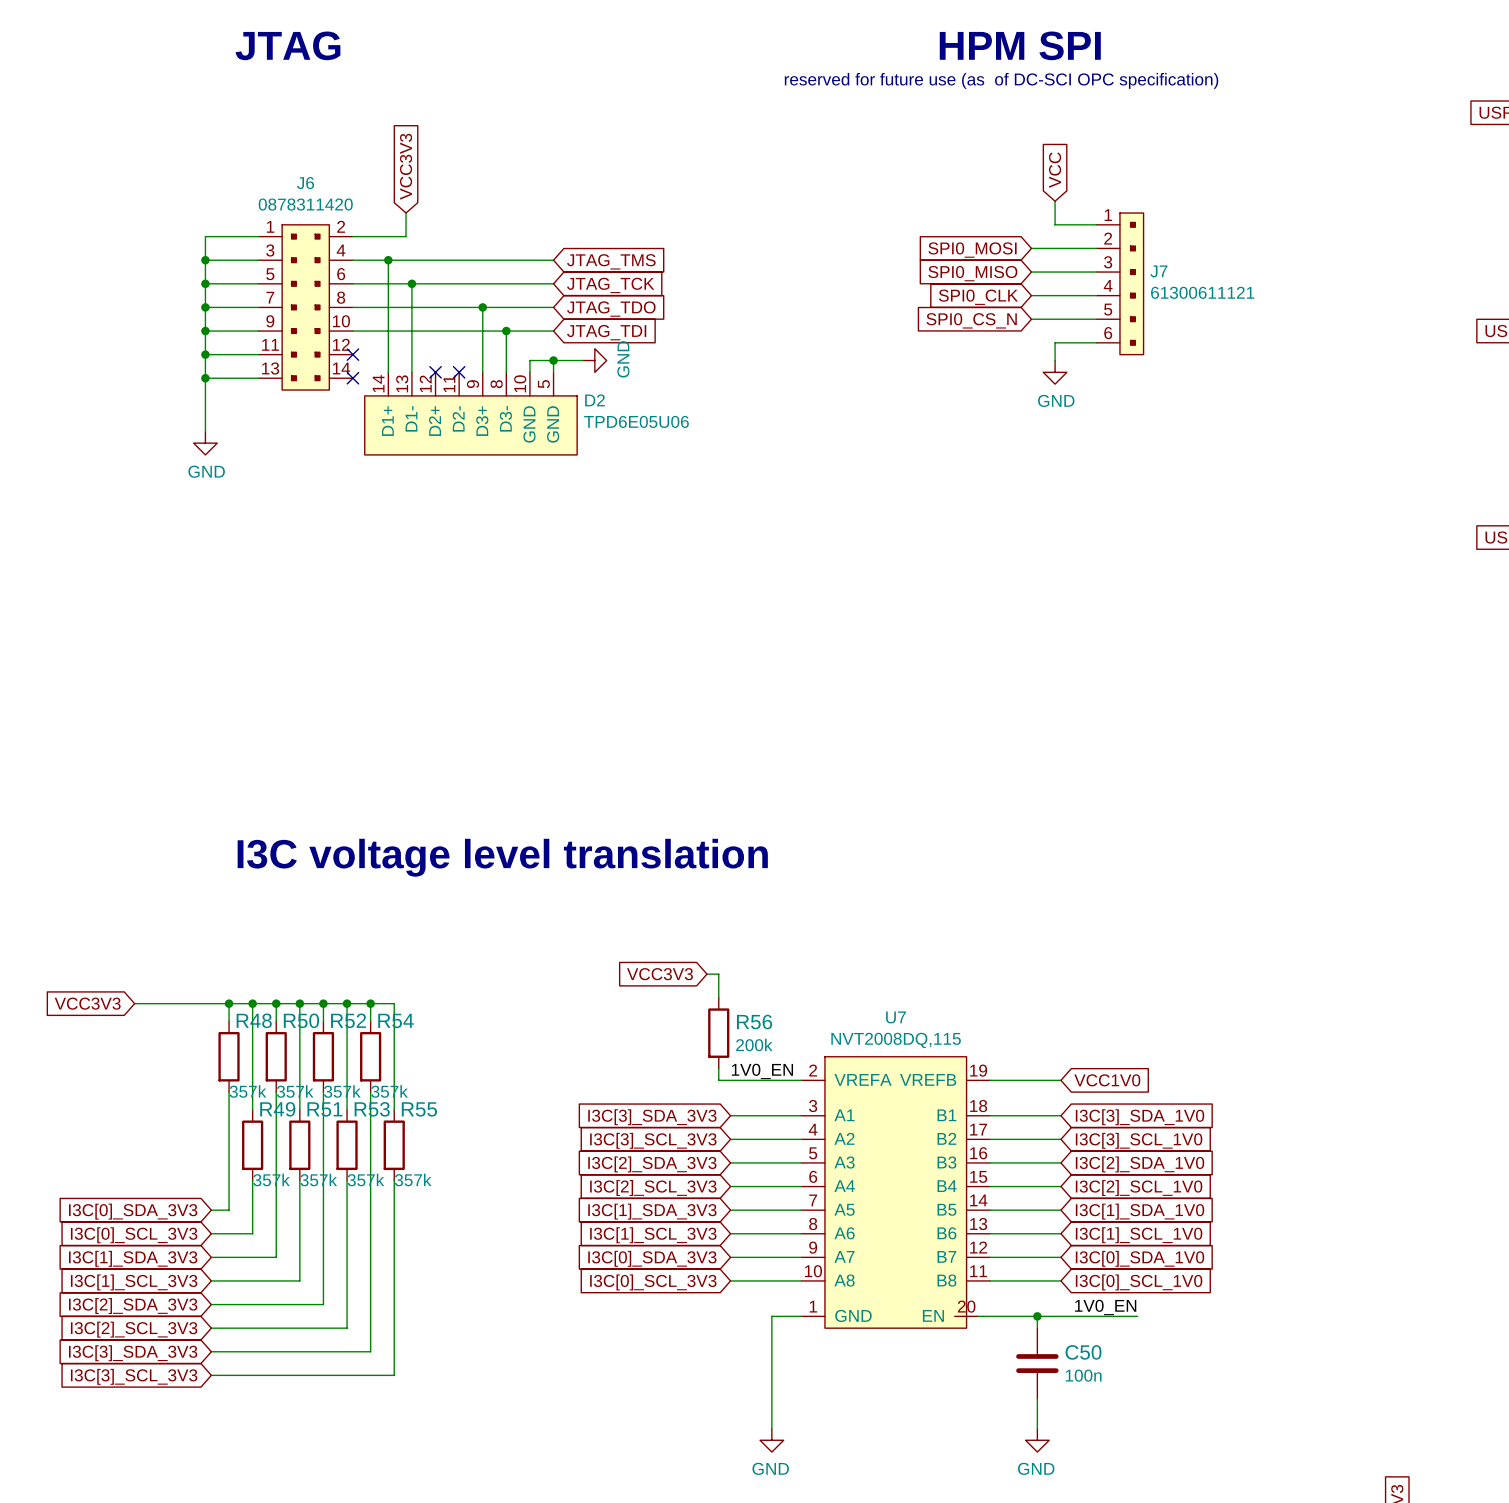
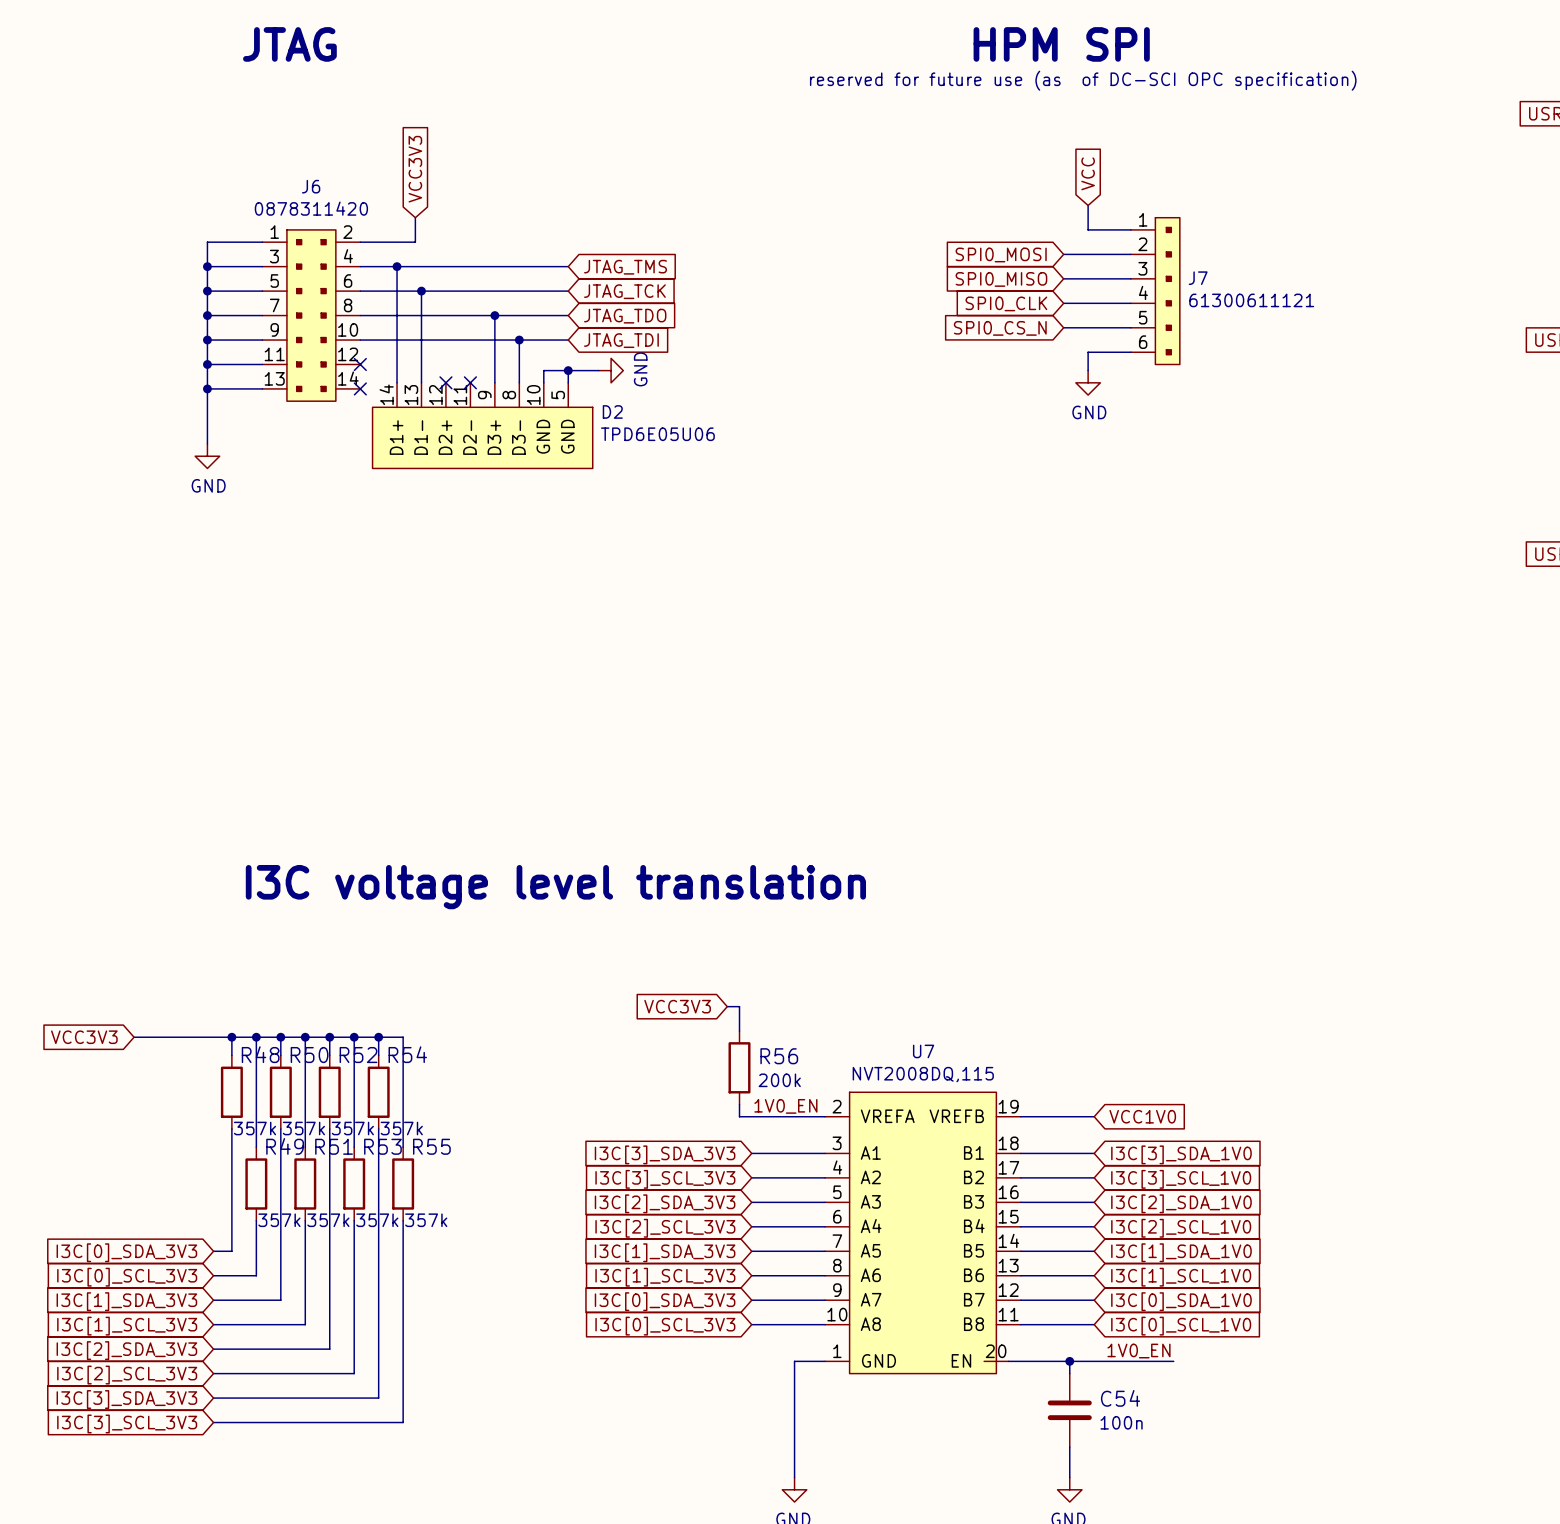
C50 name: C50 (1083, 1352) -> C54 (1120, 1398)

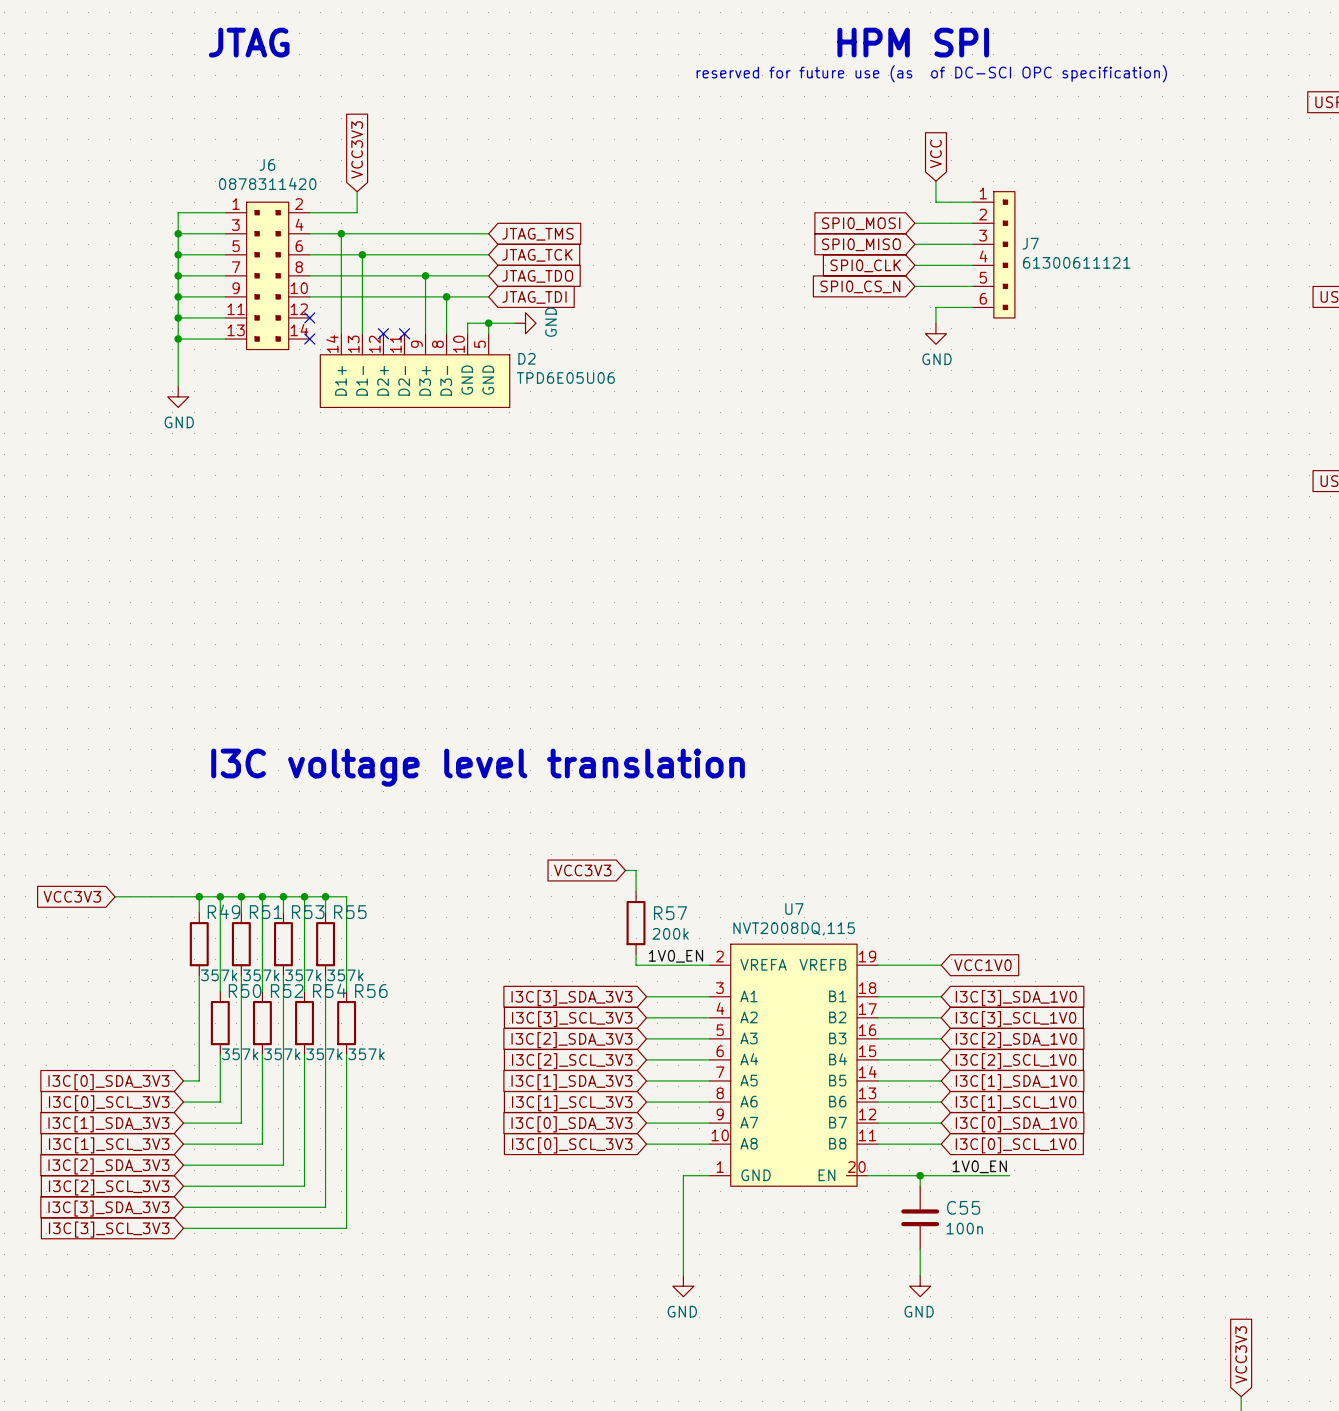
R48 name: R48 (260, 1054) -> R49 (224, 911)
R54 name: R54 (407, 1054) -> R55 (350, 912)
R50 name: R50 (309, 1055) -> R51 (266, 912)
R52 name: R52 (358, 1055) -> R53 (308, 912)
R56 name: R56 (779, 1056) -> R57 (670, 913)
R49 name: R49 (285, 1146) -> R50 (245, 991)
R51 name: R51 (334, 1146) -> R52 (287, 991)
R53 name: R53 (382, 1146) -> R54 (329, 990)
R55 name: R55 (431, 1146) -> R56 (371, 991)
C54 name: C54 (1120, 1398) -> C55 (963, 1207)

